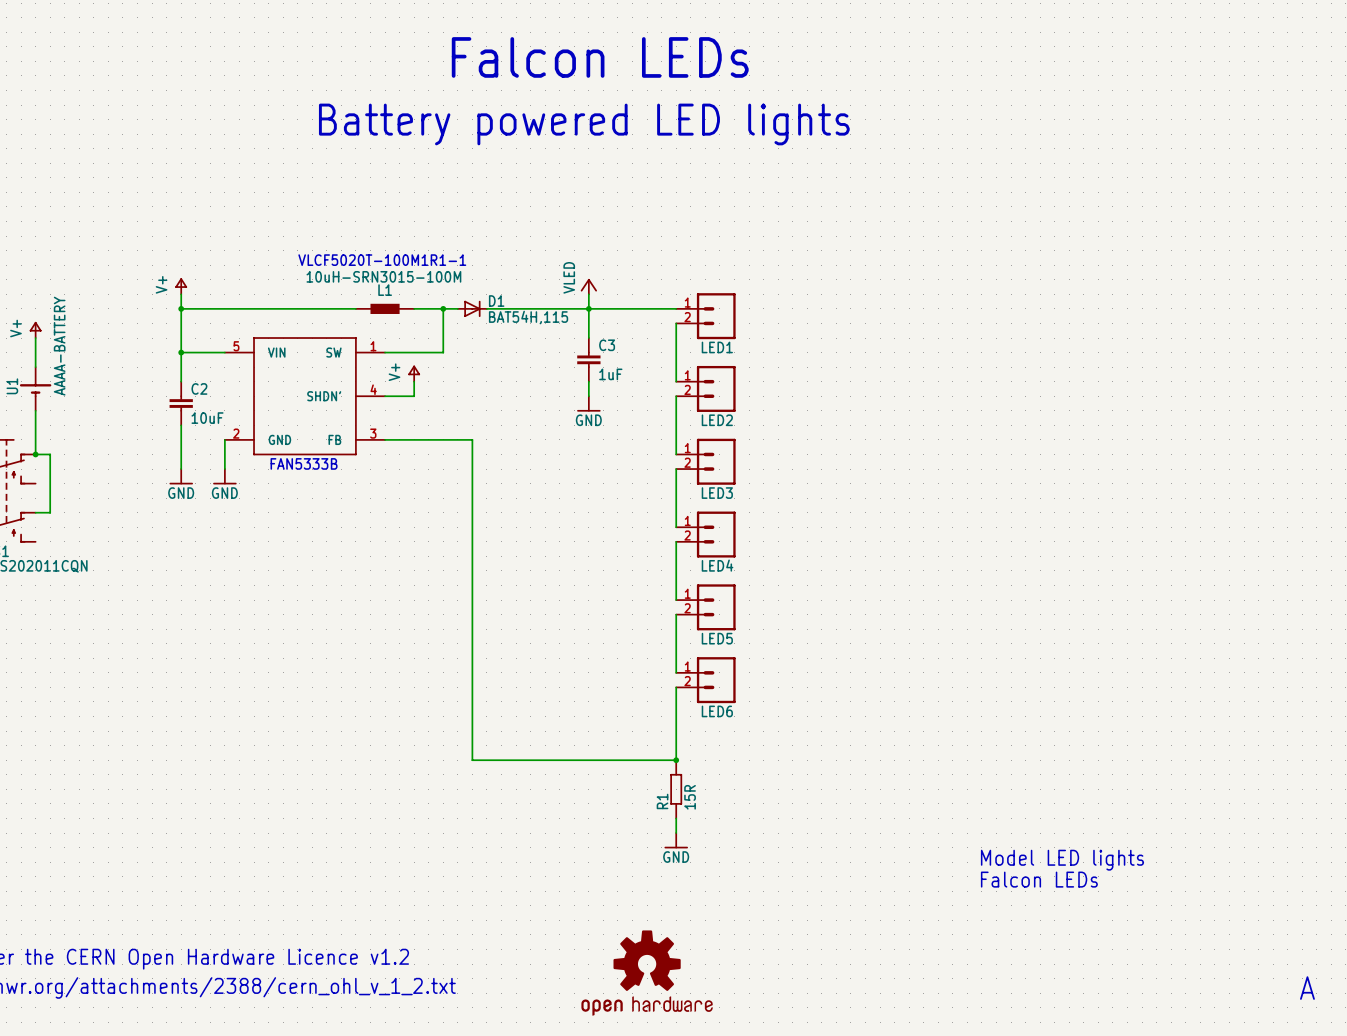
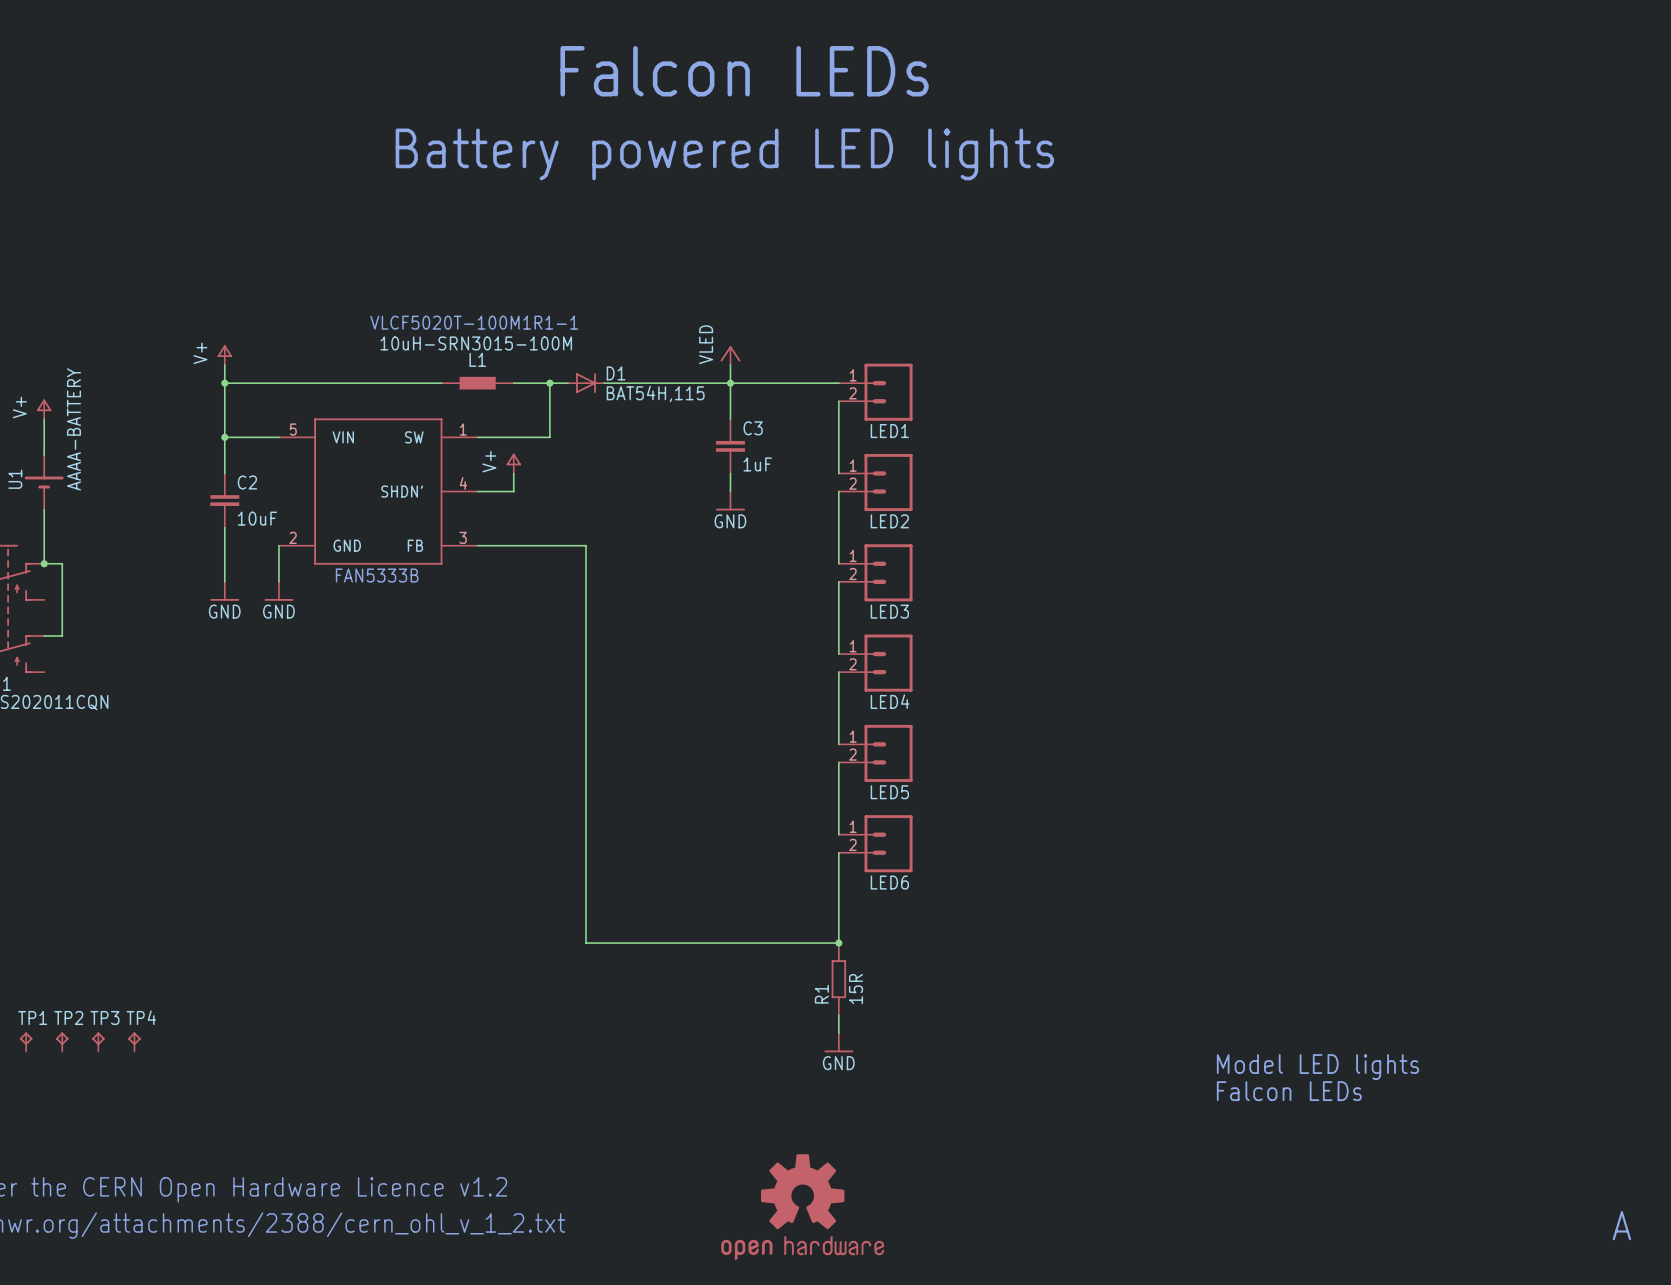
TP1: none -> (26, 1041)
TP2: none -> (62, 1041)
TP3: none -> (98, 1041)
TP4: none -> (134, 1041)

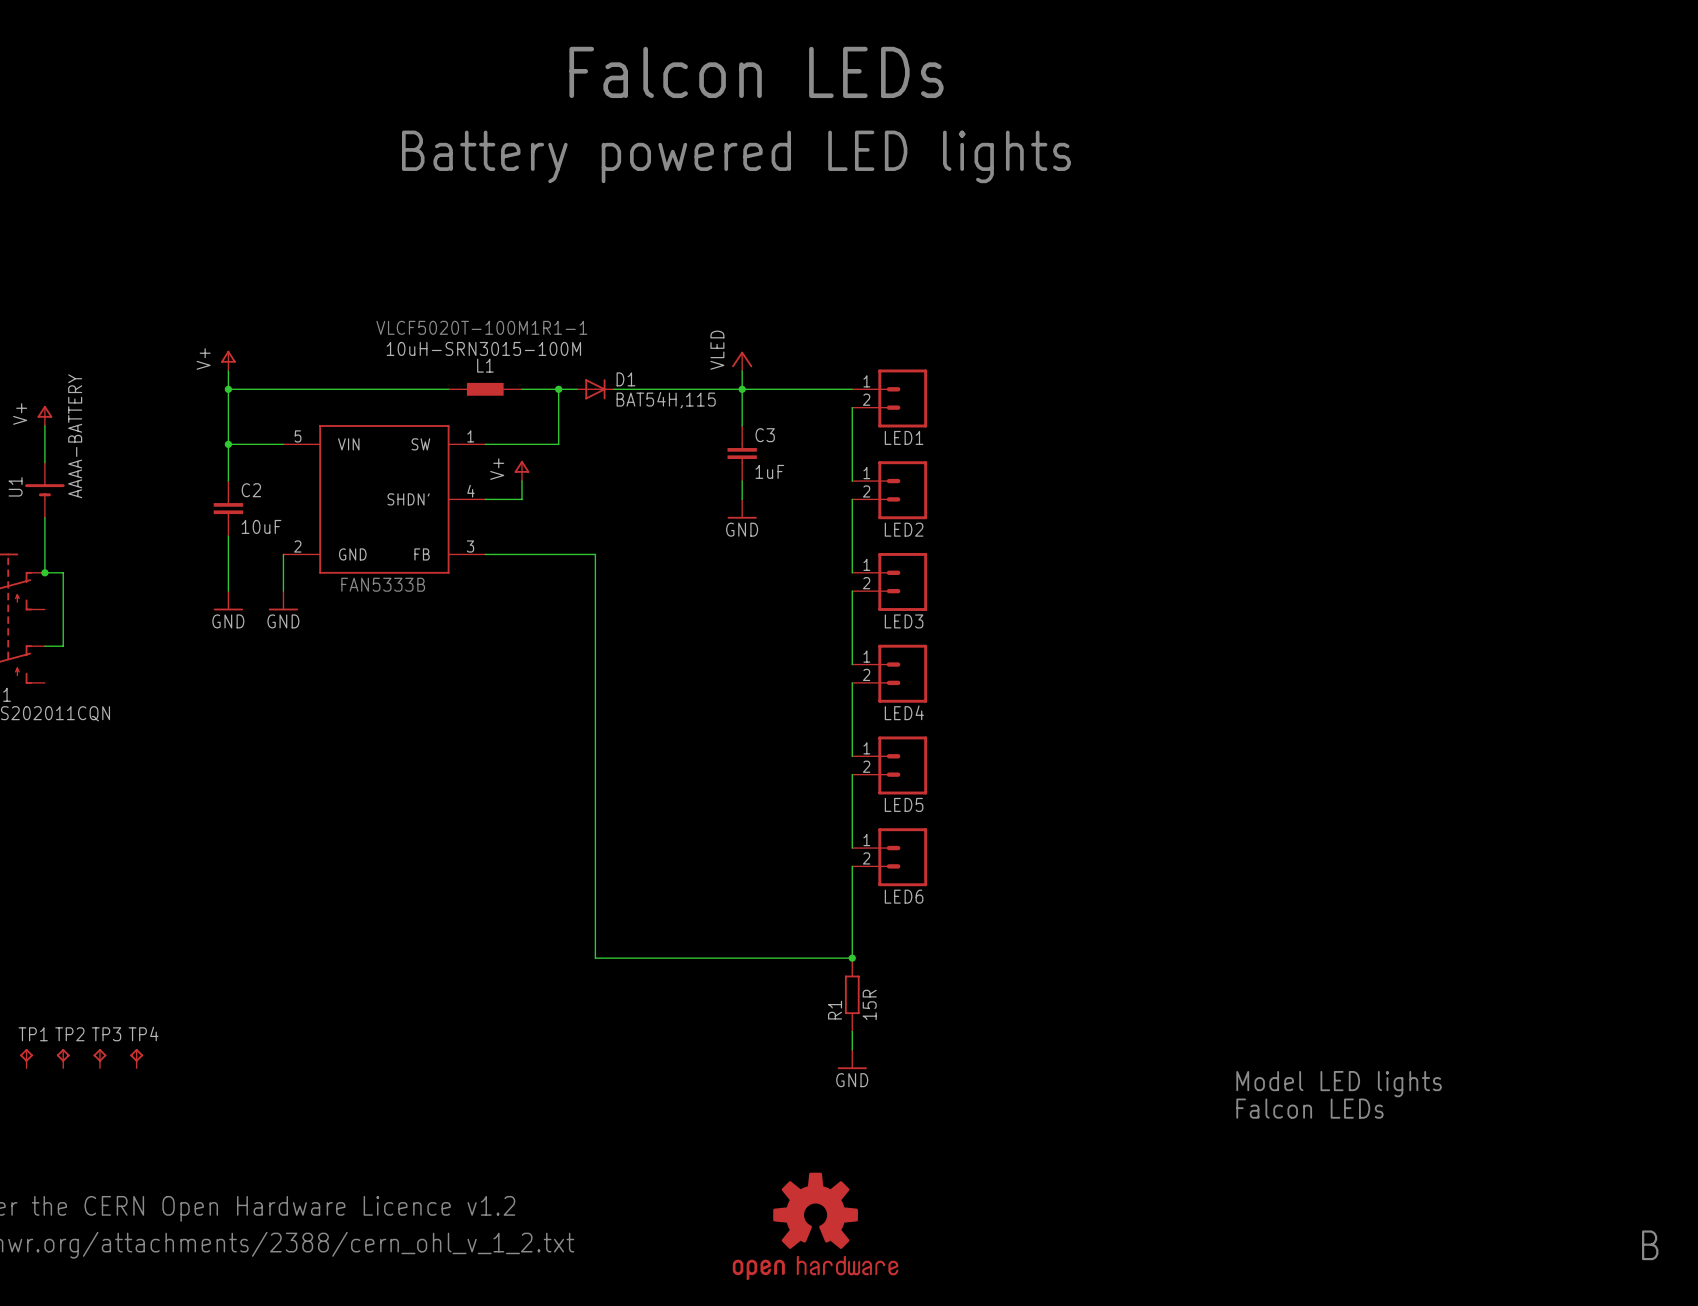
text: A (1621, 1225) -> B (1650, 1245)

